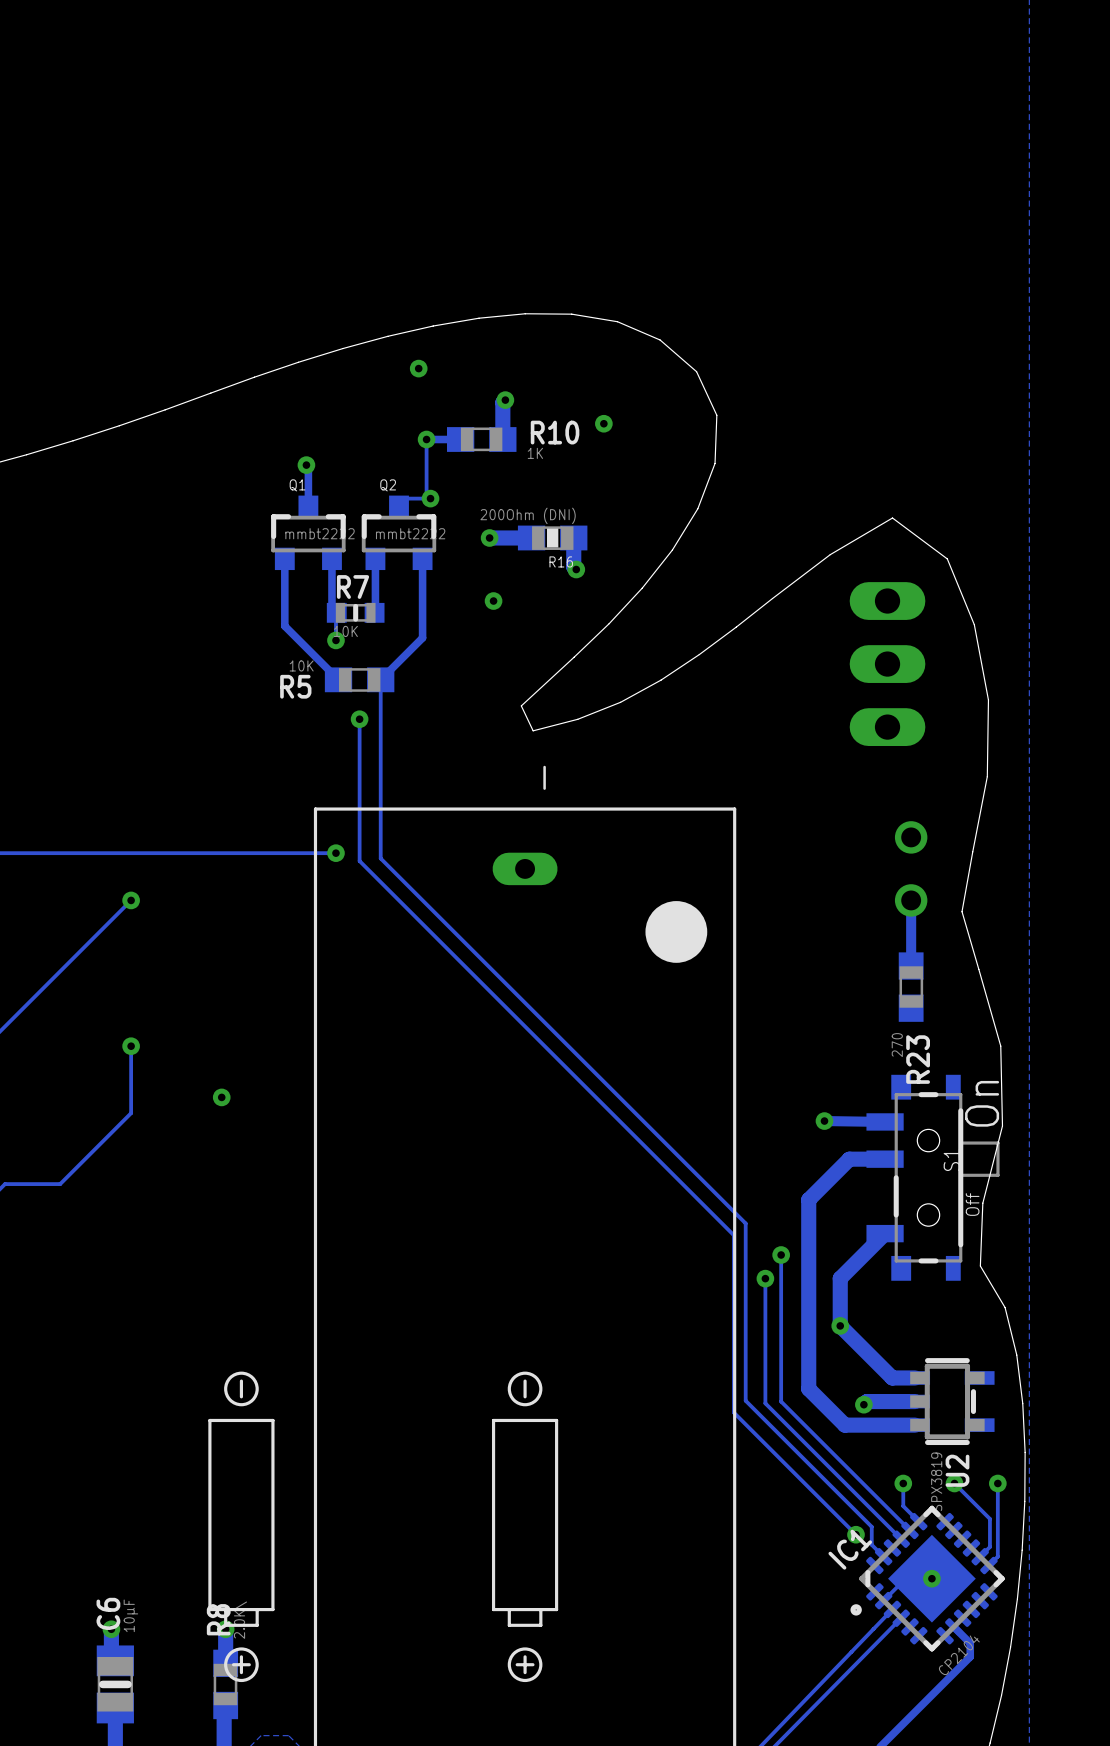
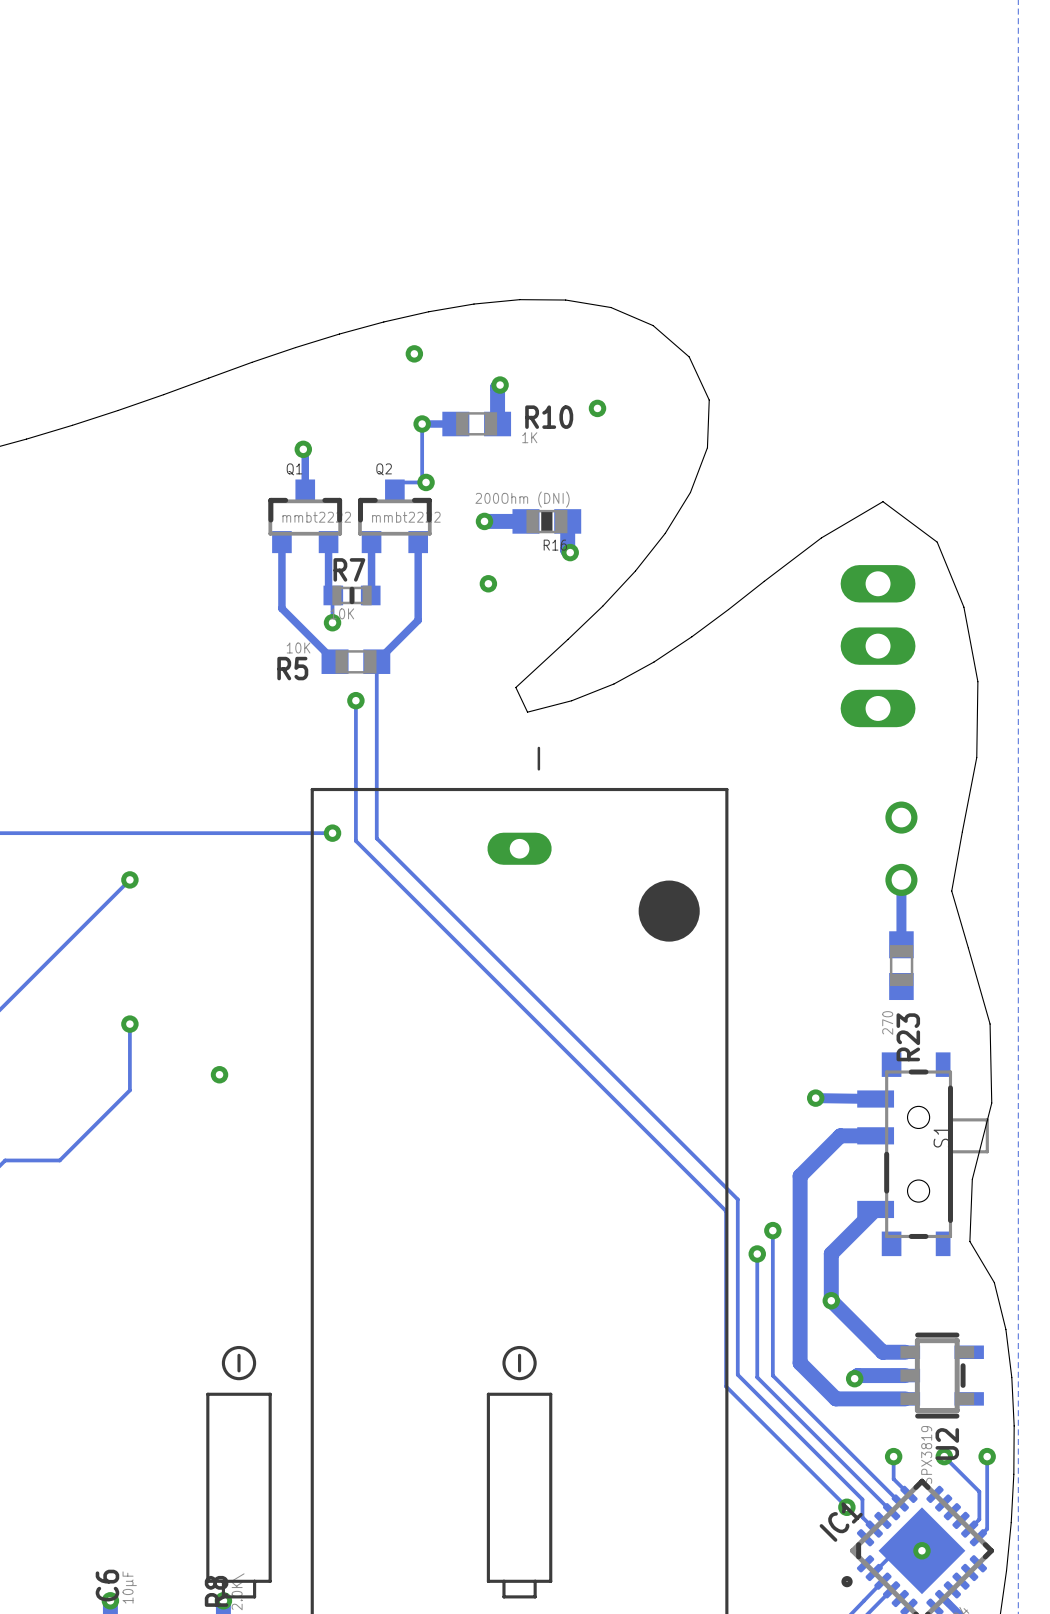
text: On (982, 1103) -> none
text: Off (972, 1204) -> none

